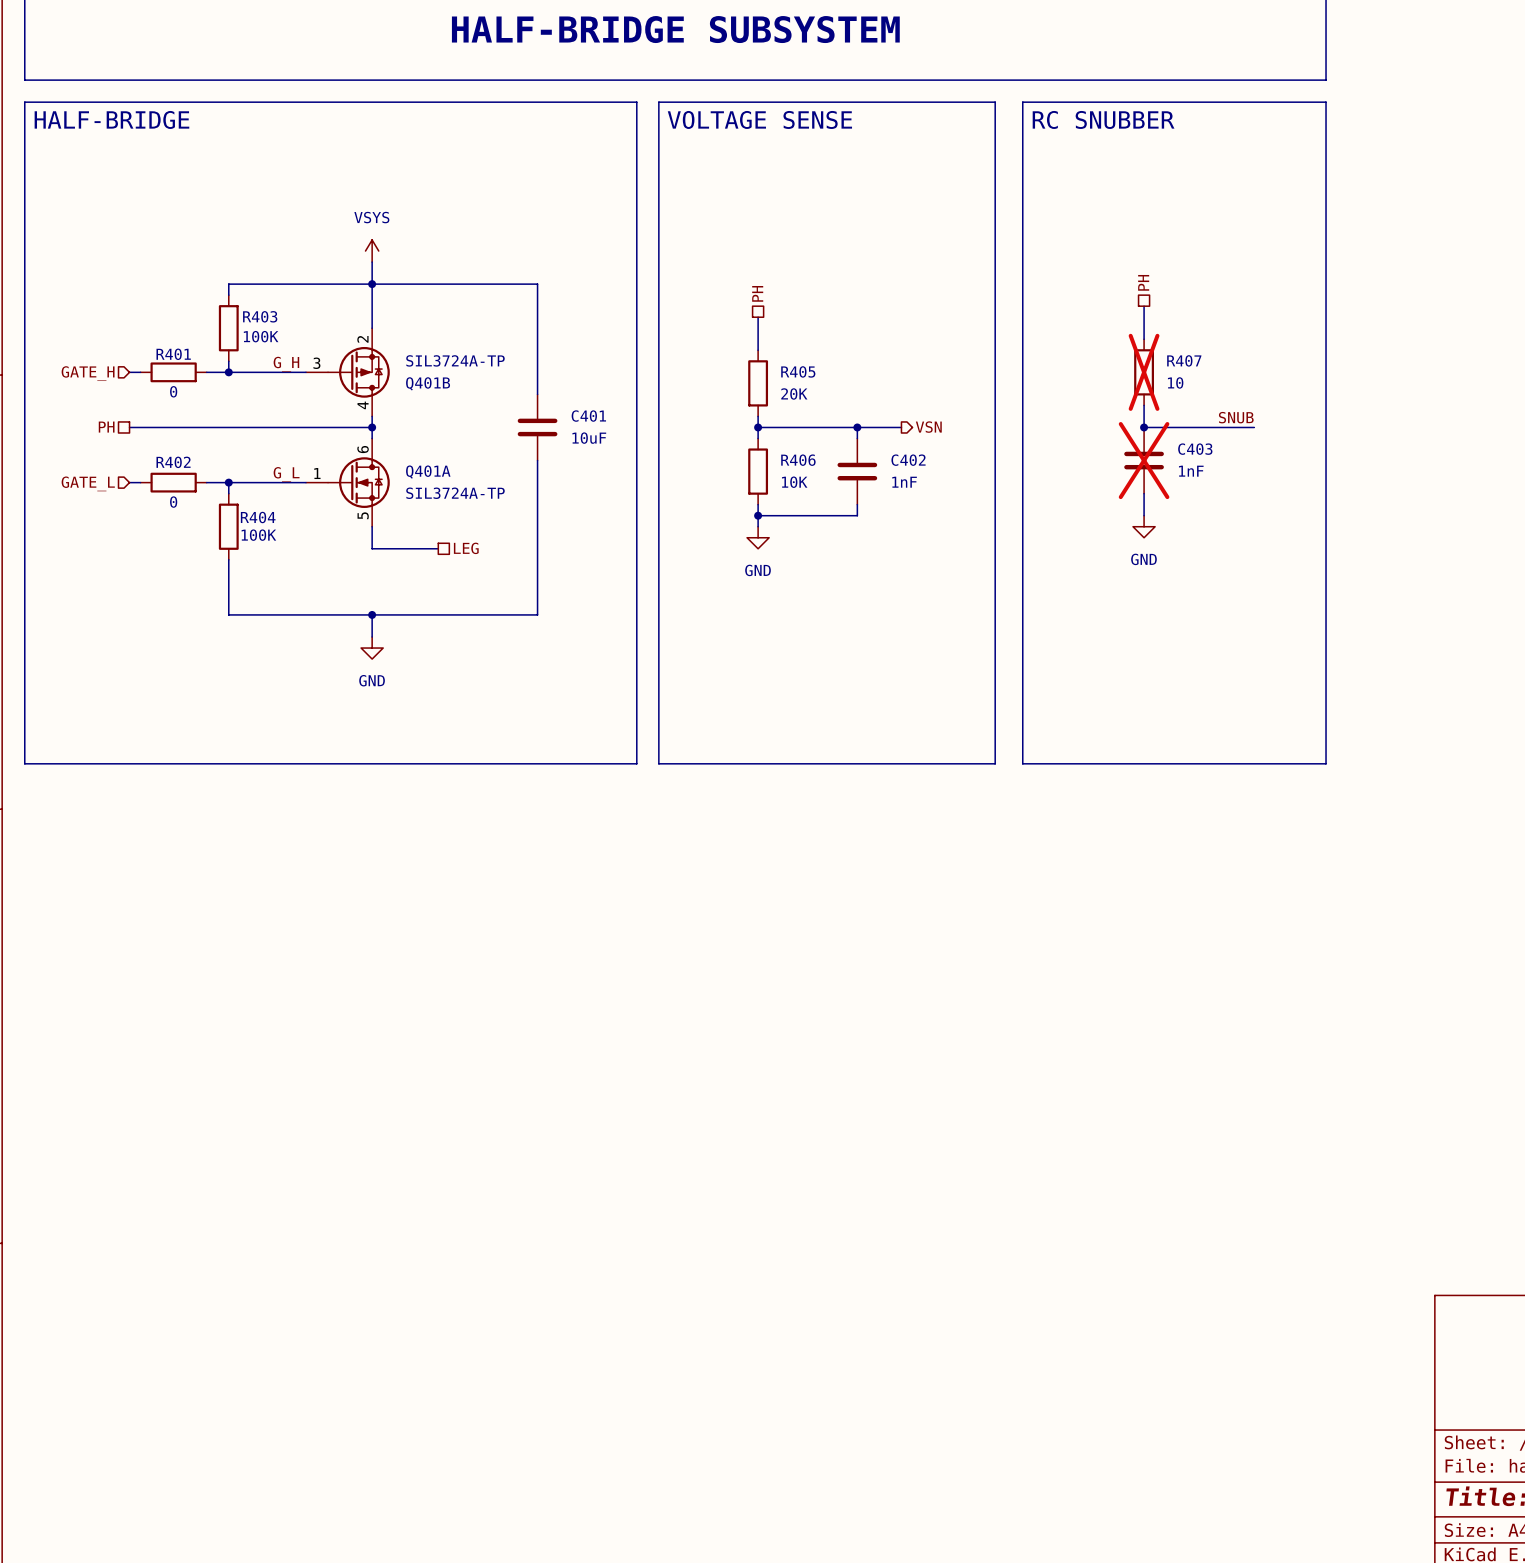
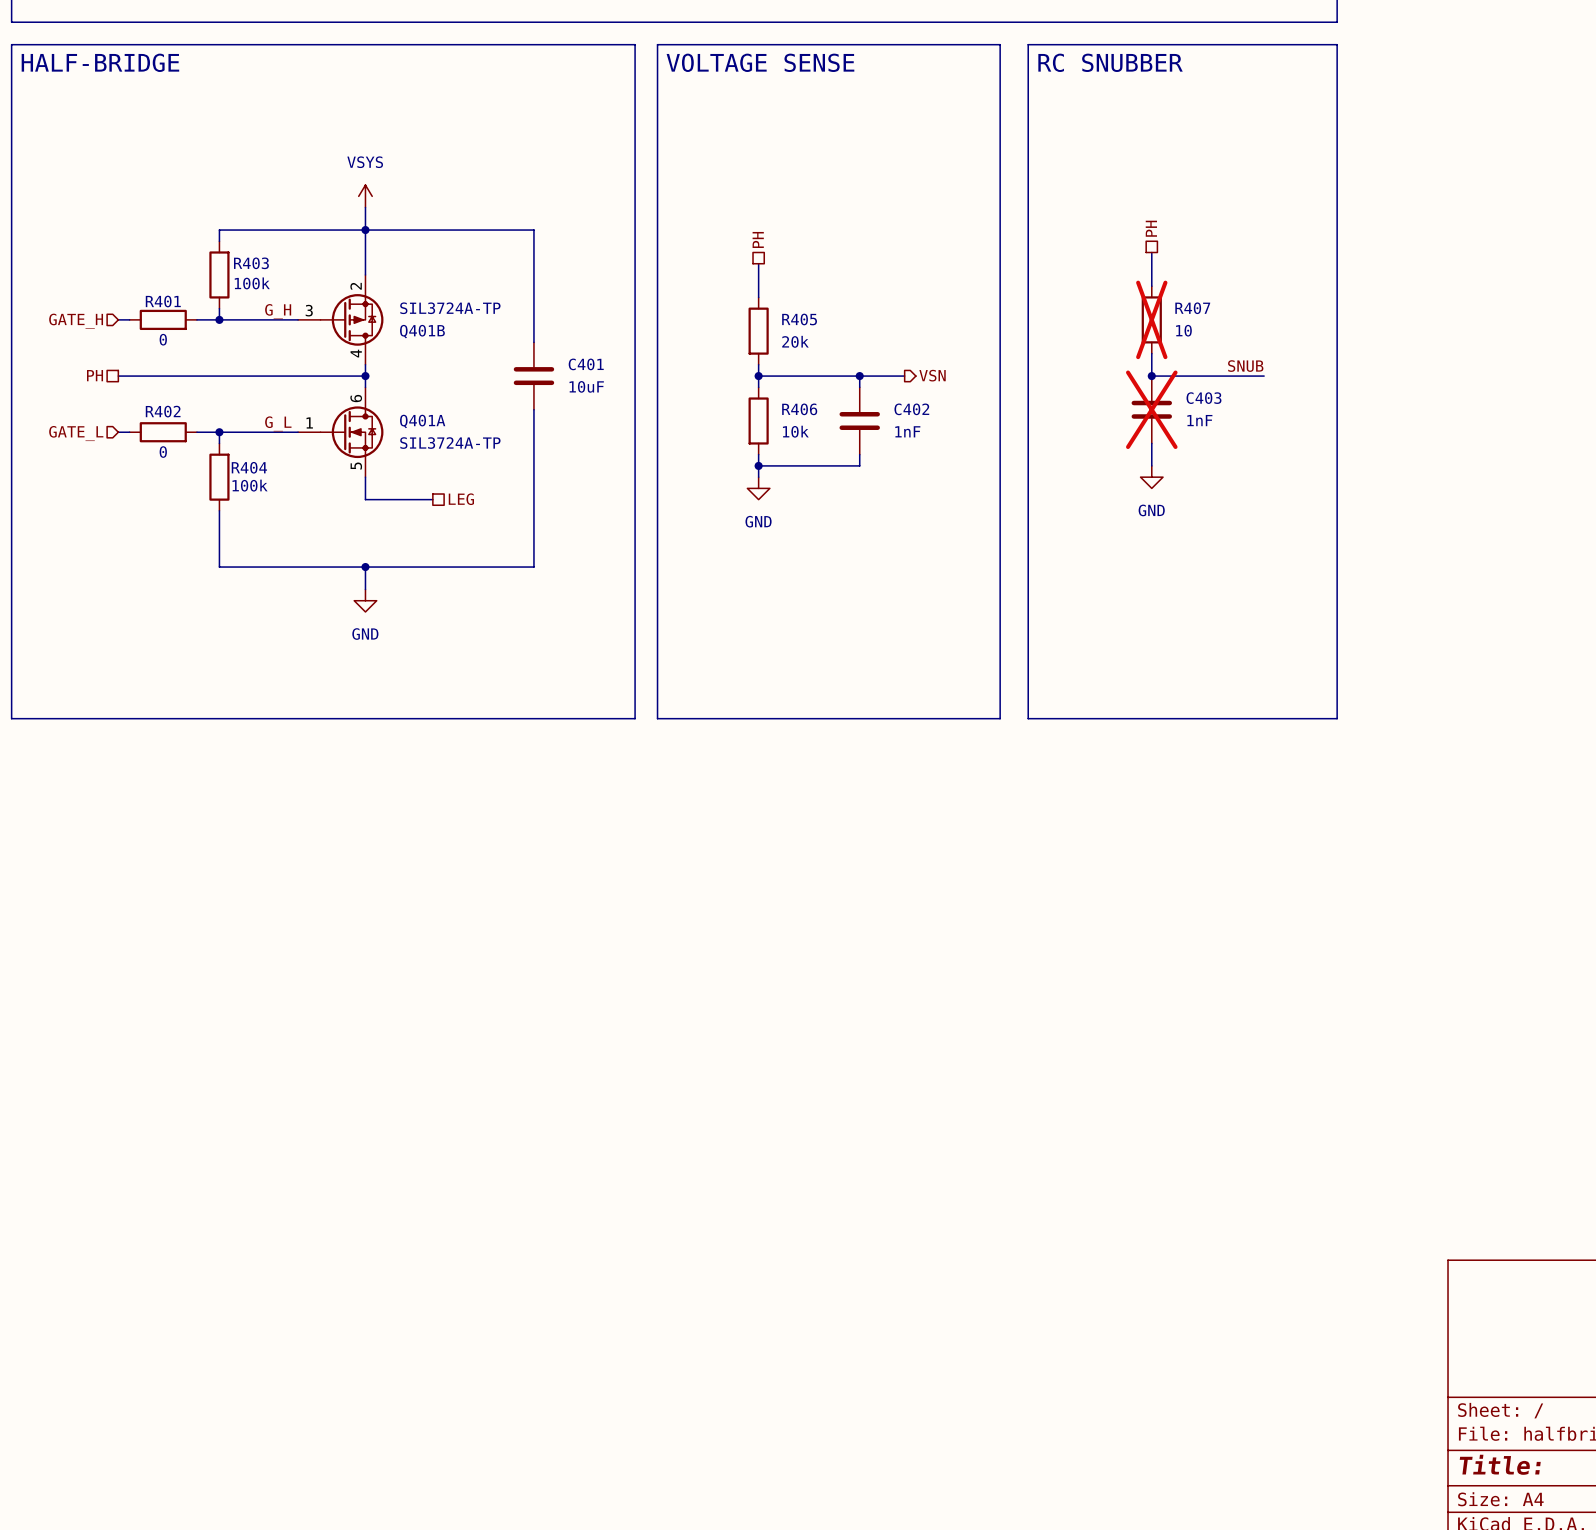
R403 value: 100K (261, 336) -> 100k (252, 283)
R405 value: 20K (794, 393) -> 20k (795, 341)
R406 value: 10K (794, 482) -> 10k (795, 431)
R404 value: 100K (258, 535) -> 100k (250, 485)

